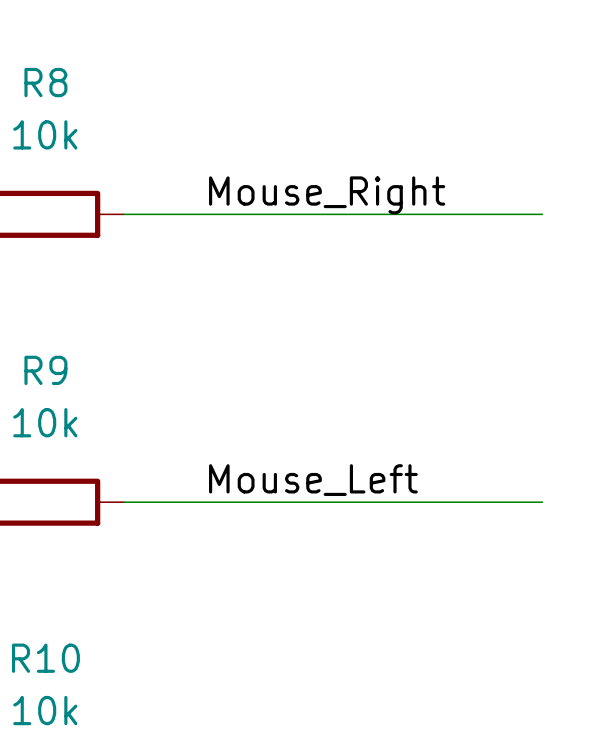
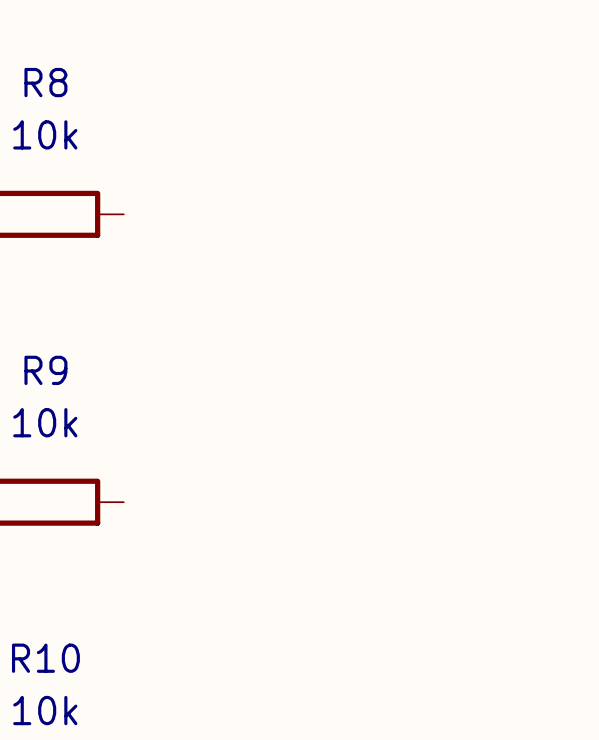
label: Mouse_Right (327, 195) -> none
wire: (123, 214) (542, 214) -> none
label: Mouse_Left (313, 480) -> none
wire: (123, 502) (542, 502) -> none

